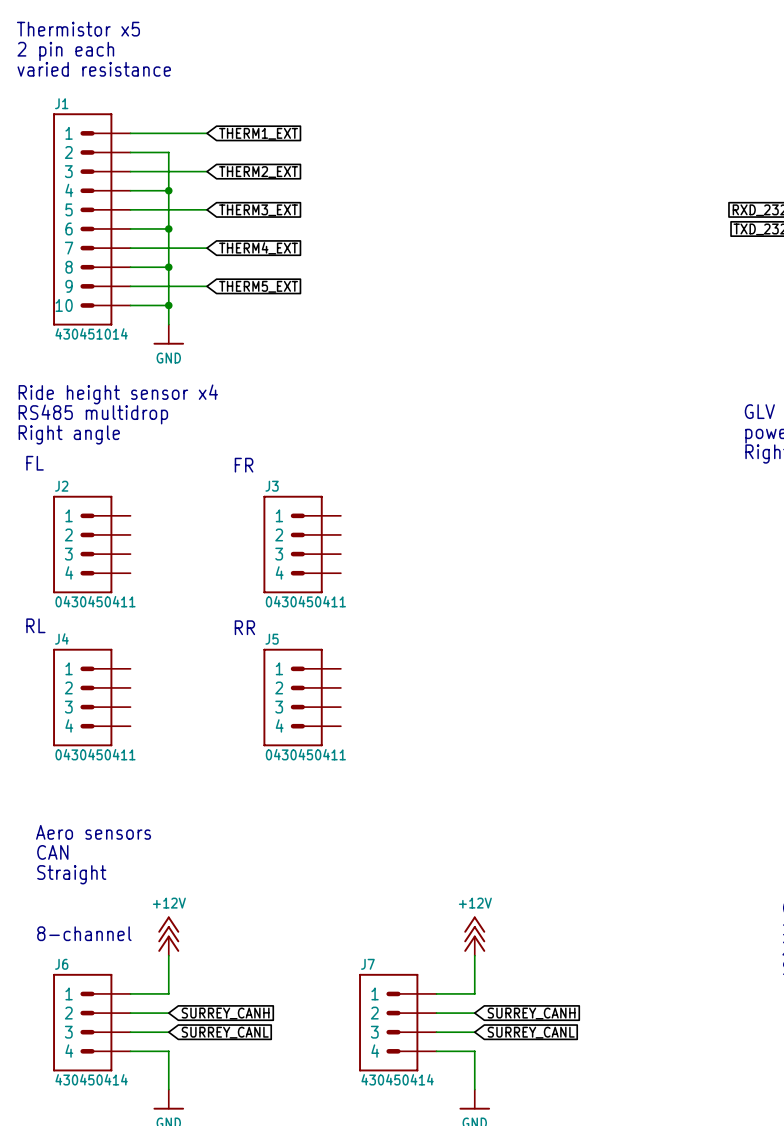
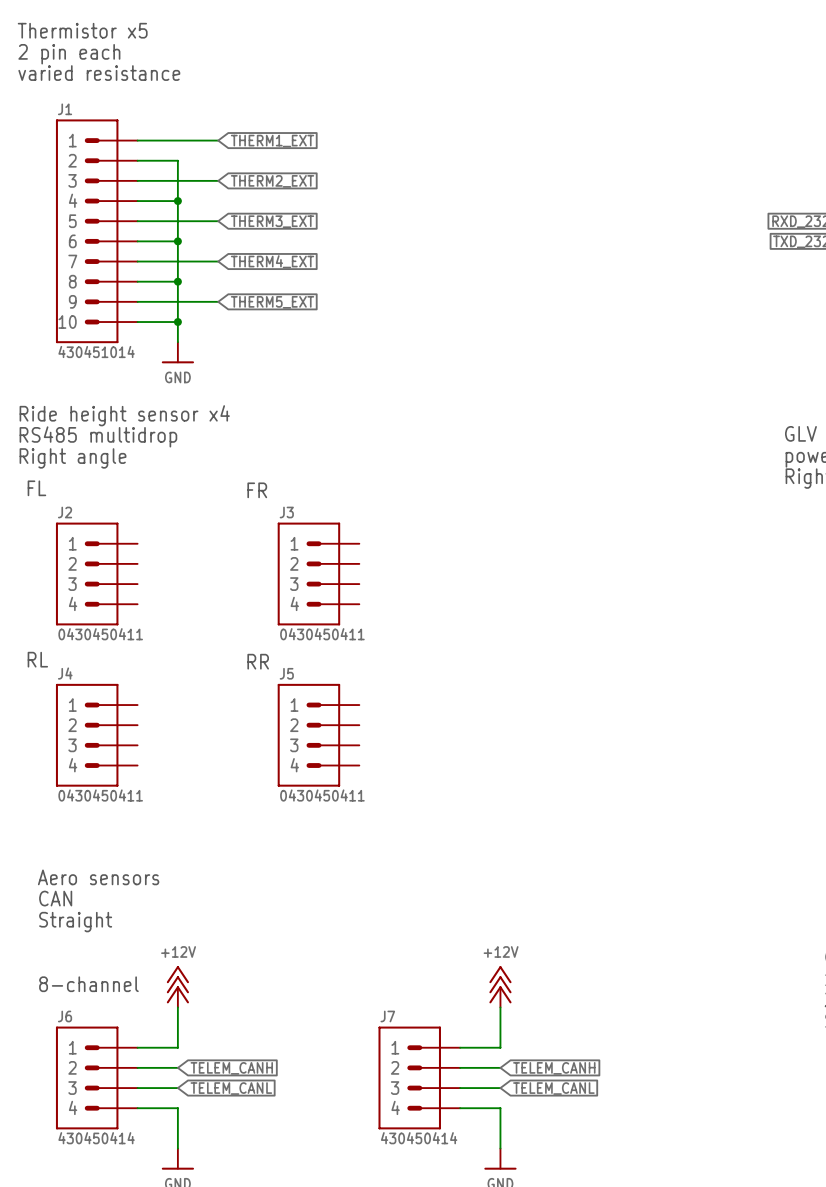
global label: SURREY_CANH (225, 1013) -> TELEM_CANH (231, 1068)
global label: SURREY_CANH (531, 1013) -> TELEM_CANH (554, 1068)
global label: SURREY_CANL (225, 1032) -> TELEM_CANL (231, 1088)
global label: SURREY_CANL (531, 1032) -> TELEM_CANL (553, 1088)

